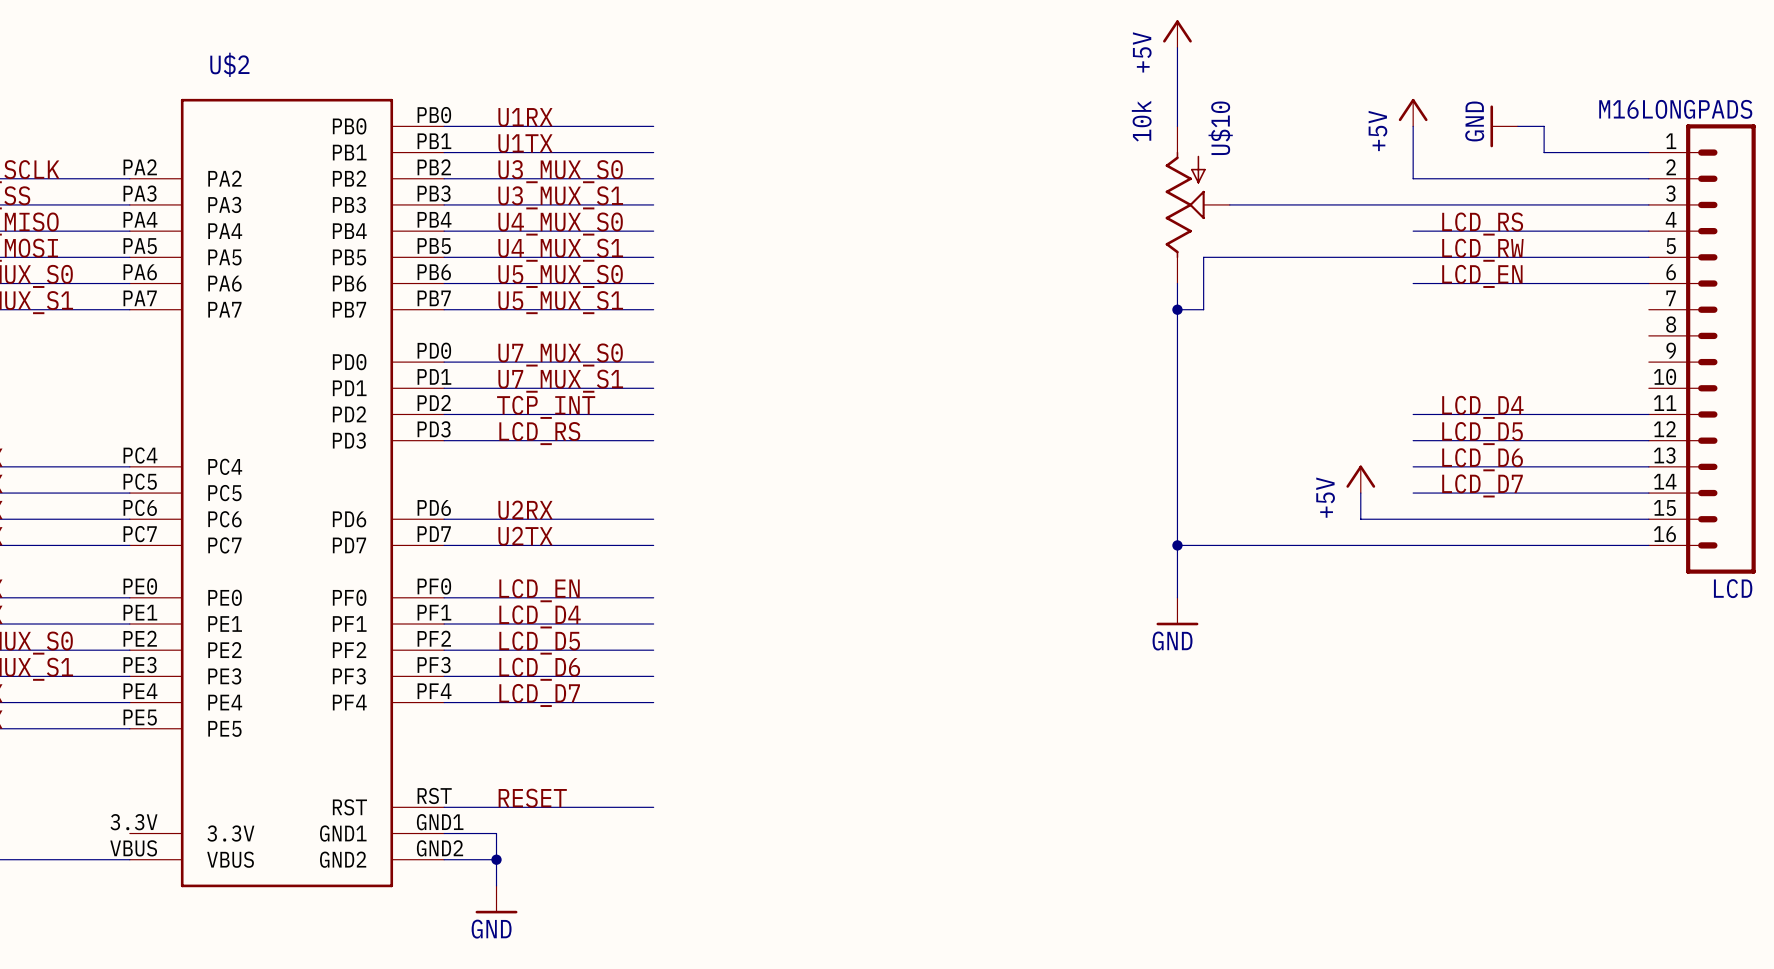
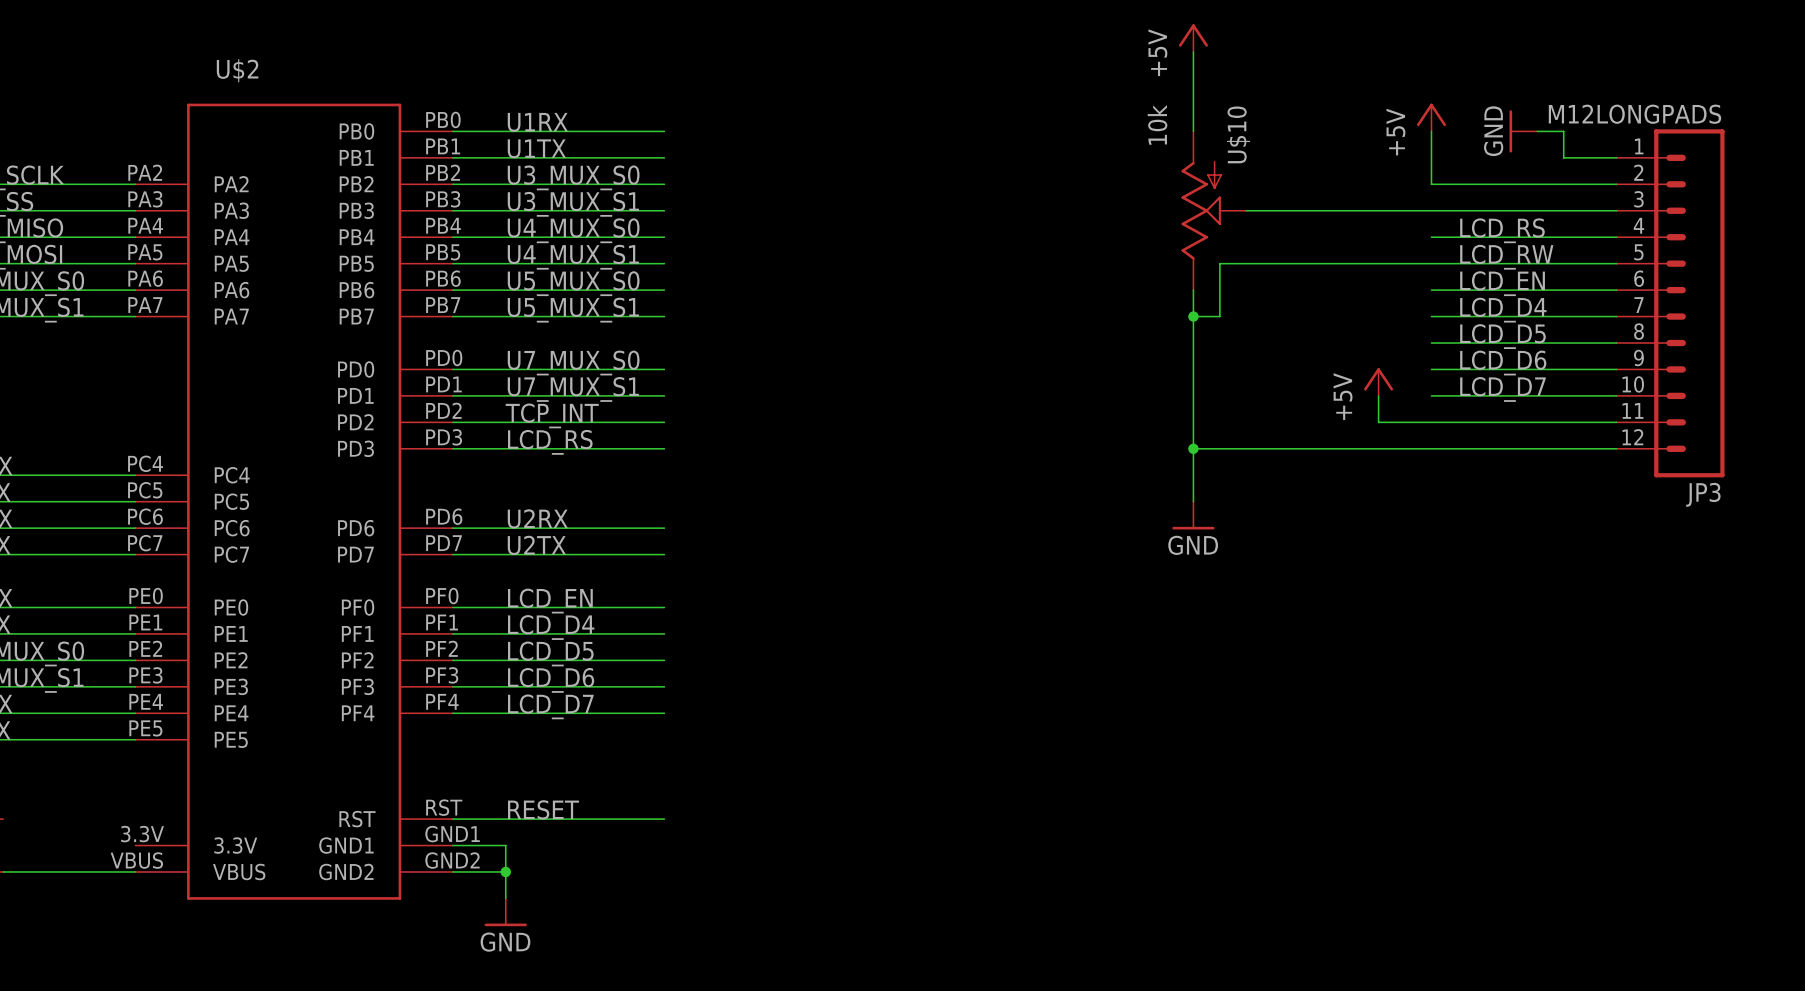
JP3: none -> M12LONGPADS (1670, 303)
wire: none -> (1431, 316) (1616, 316)
wire: none -> (1431, 343) (1616, 343)
LCD: M16LONGPADS (1702, 349) -> none
wire: none -> (1431, 369) (1616, 369)
wire: none -> (1378, 395) (1378, 422) (1431, 422)
wire: none -> (1431, 395) (1616, 395)
label position: LCD_D4 (1482, 407) -> LCD_D4 (1503, 310)
label position: LCD_D5 (1482, 433) -> LCD_D5 (1502, 336)
junction: none -> (1193, 448)
label position: LCD_D6 (1482, 459) -> LCD_D6 (1503, 363)
wire: (1413, 466) (1648, 466) -> (1193, 448) (1431, 448)
power symbol position: +5V (1360, 479) -> +5V (1378, 382)
label position: LCD_D7 (1482, 485) -> LCD_D7 (1503, 389)
wire: (1177, 493) (1177, 597) -> none
wire: (1360, 493) (1360, 519) (1648, 519) -> none
wire: (1413, 493) (1648, 493) -> none
wire: (1177, 545) (1648, 545) -> none
junction: (1177, 545) -> none
power symbol position: GND (1177, 611) -> GND (1193, 515)

